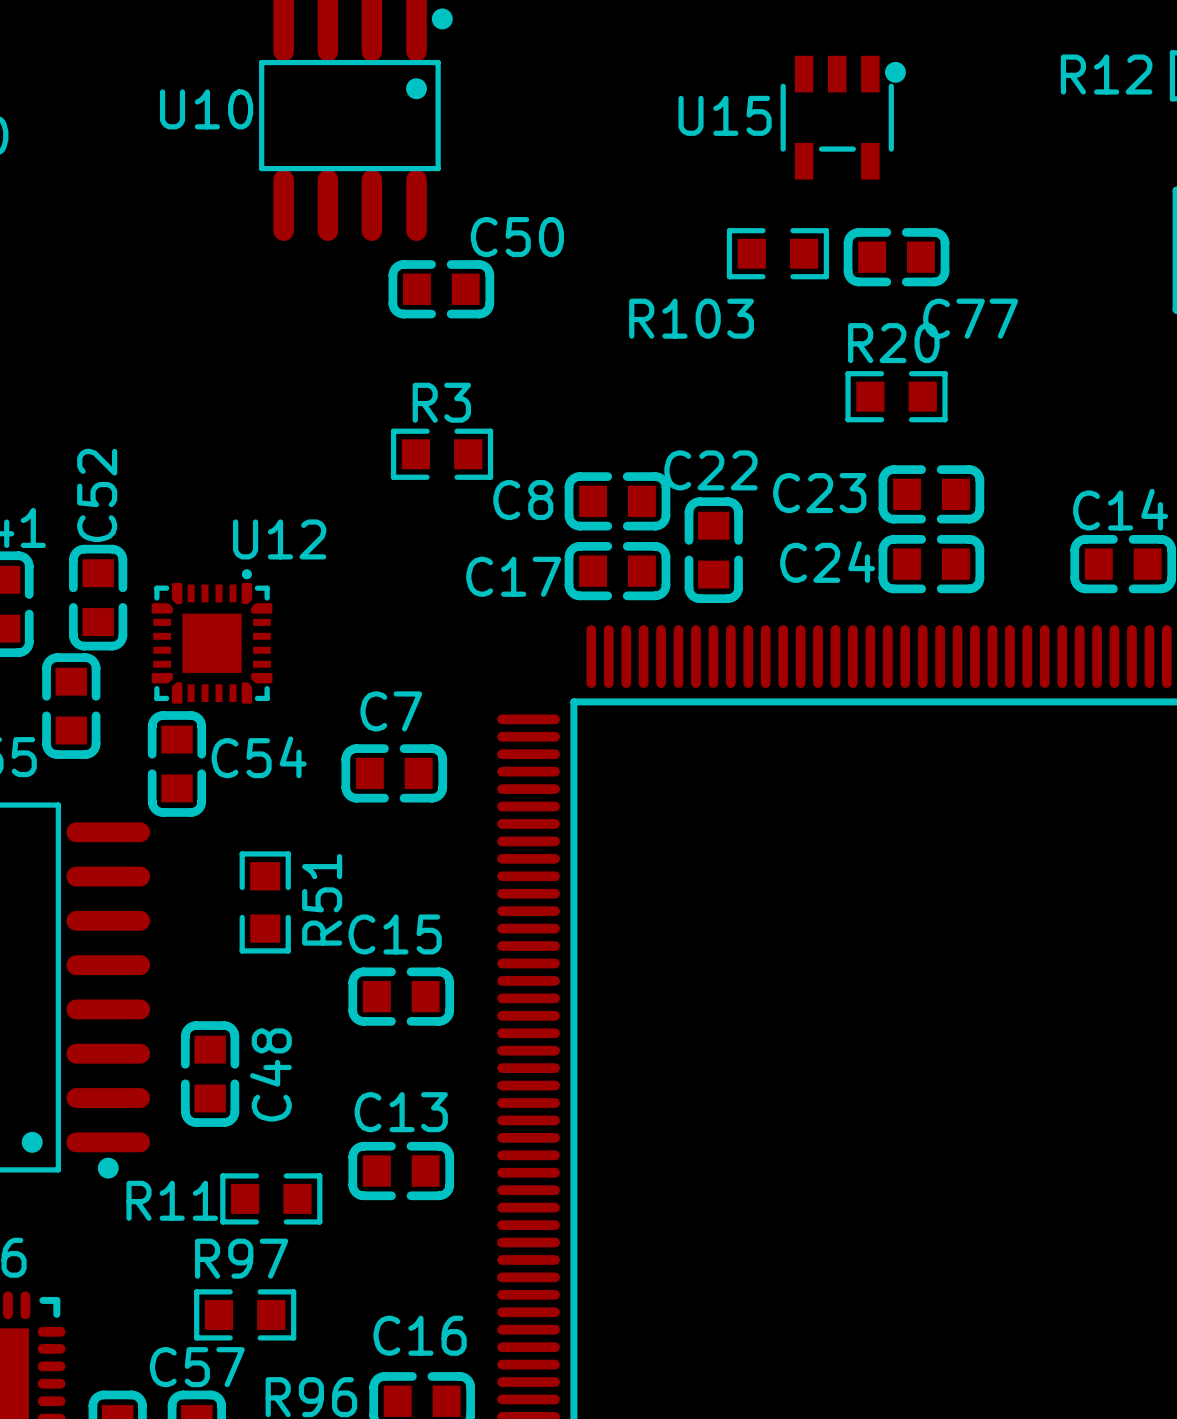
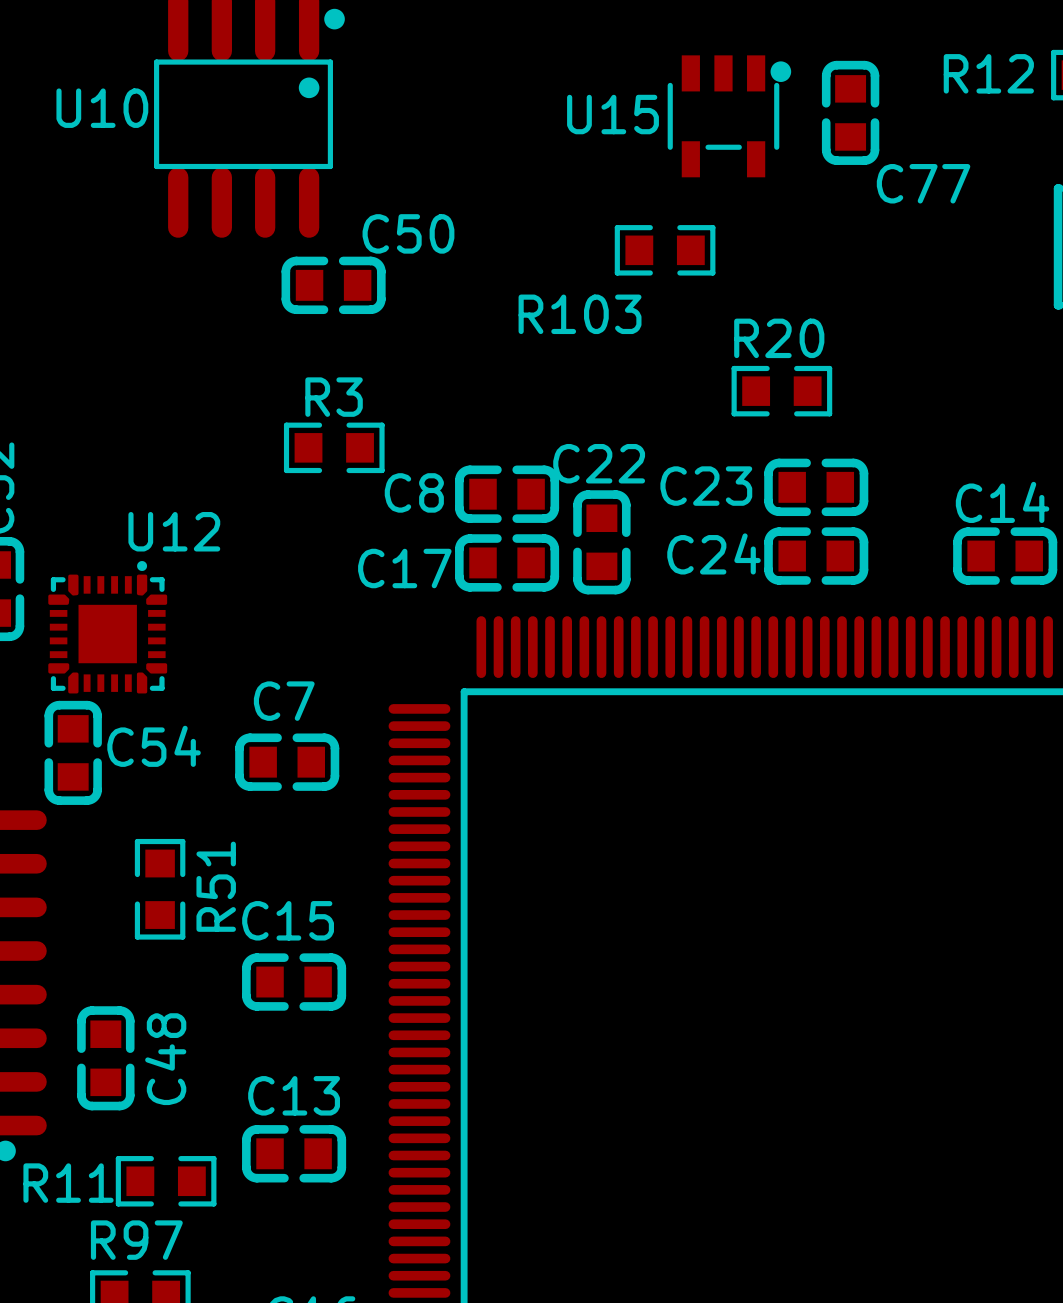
C77 rotation: 0° (896, 257) -> 90° clockwise (850, 112)
C77 position: (896, 257) -> (850, 112)

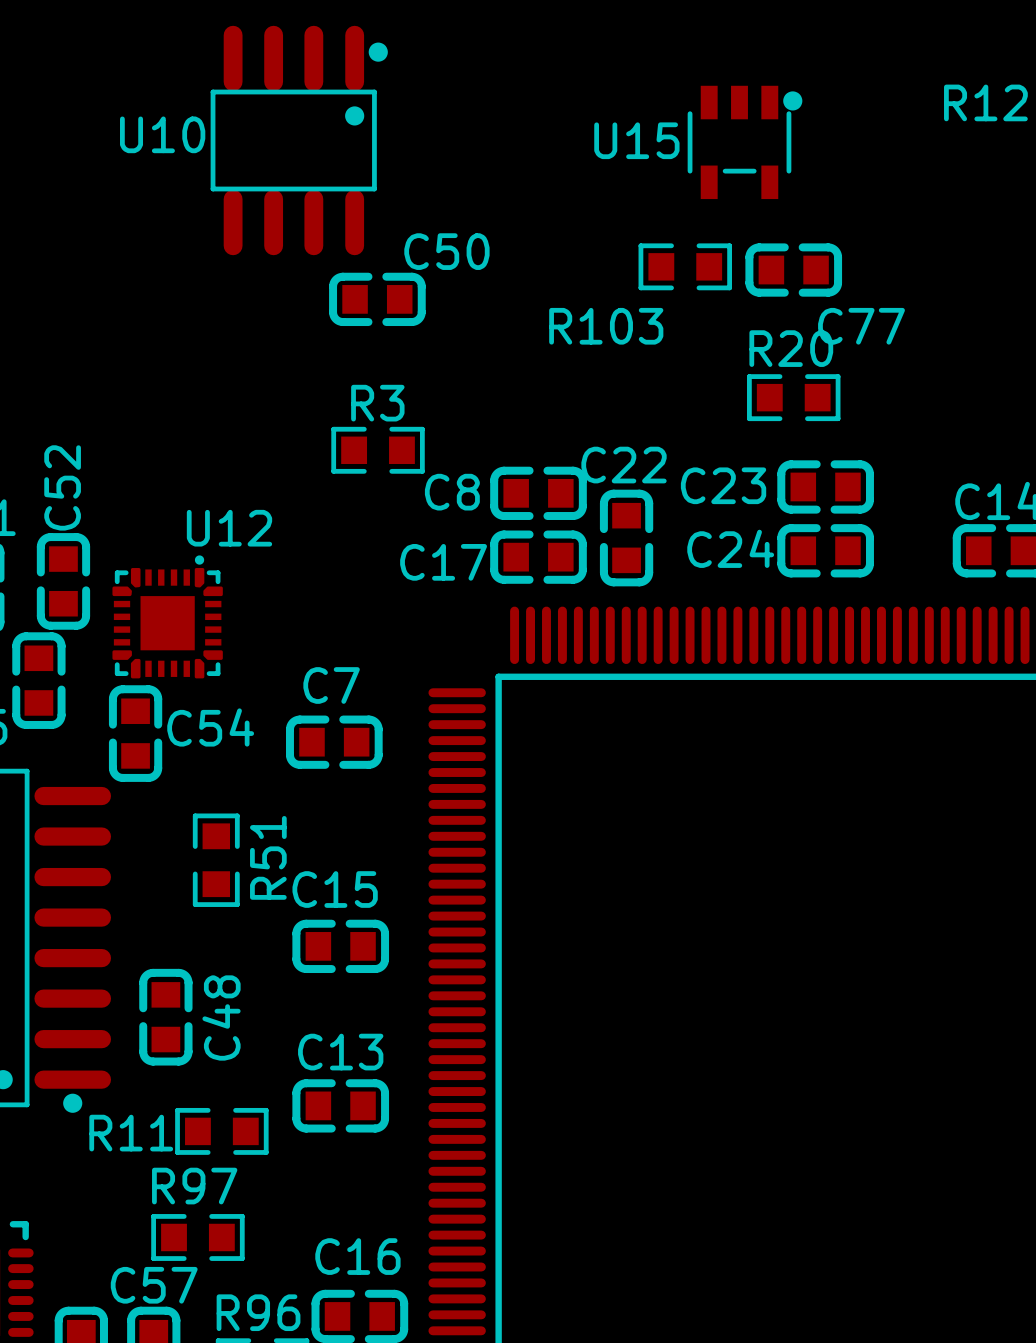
C77 rotation: 0° (850, 112) -> 90° clockwise (793, 270)
C77 position: (850, 112) -> (793, 270)

